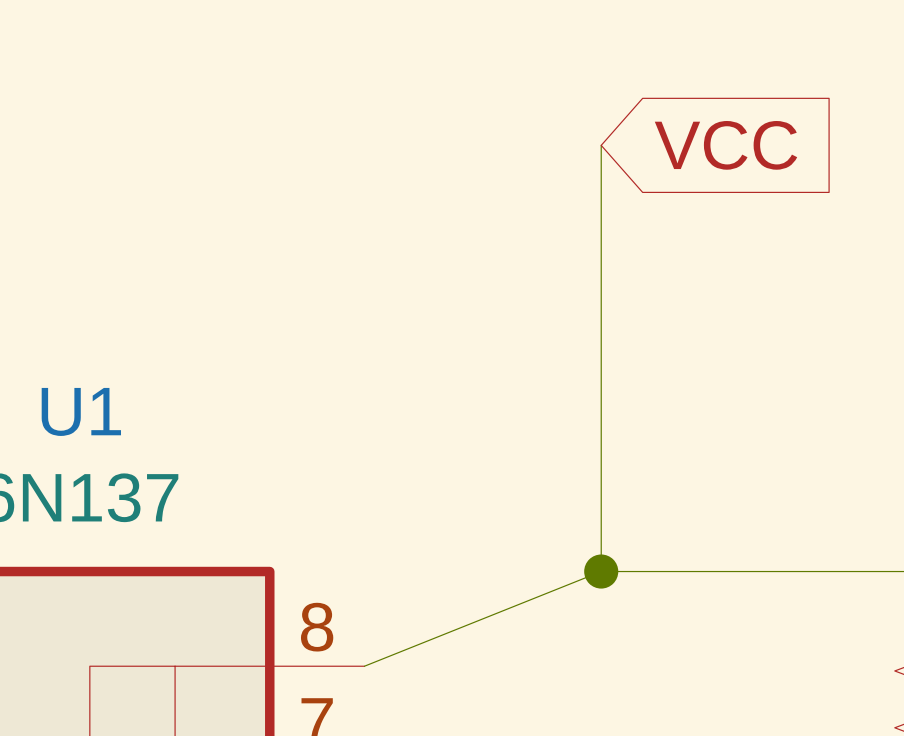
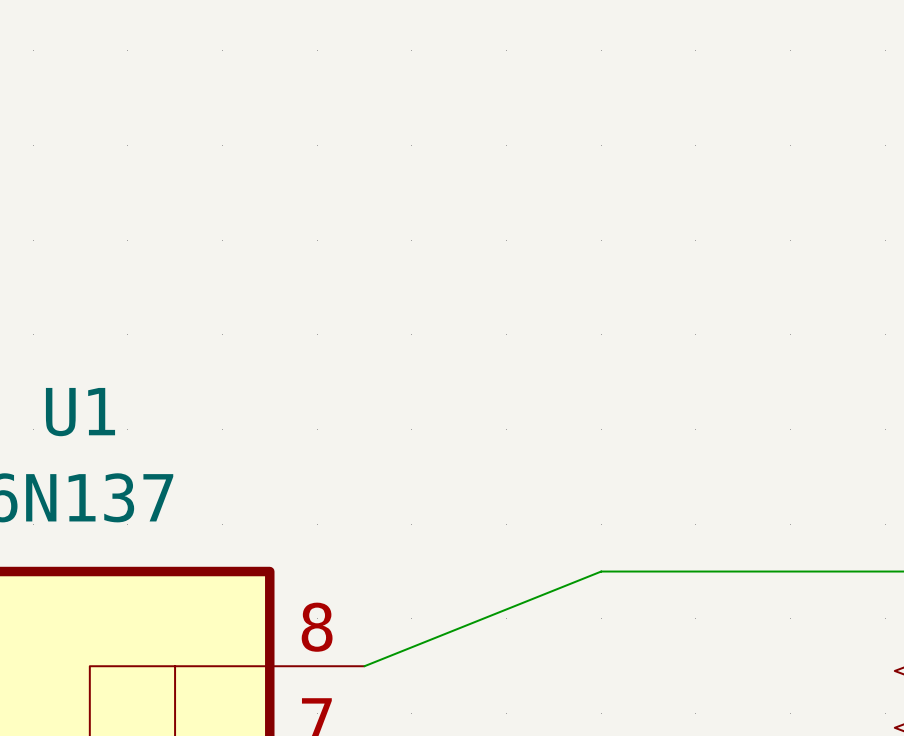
wire: (601, 145) (601, 571) -> none
global label: VCC (725, 145) -> none
junction: (601, 571) -> none

